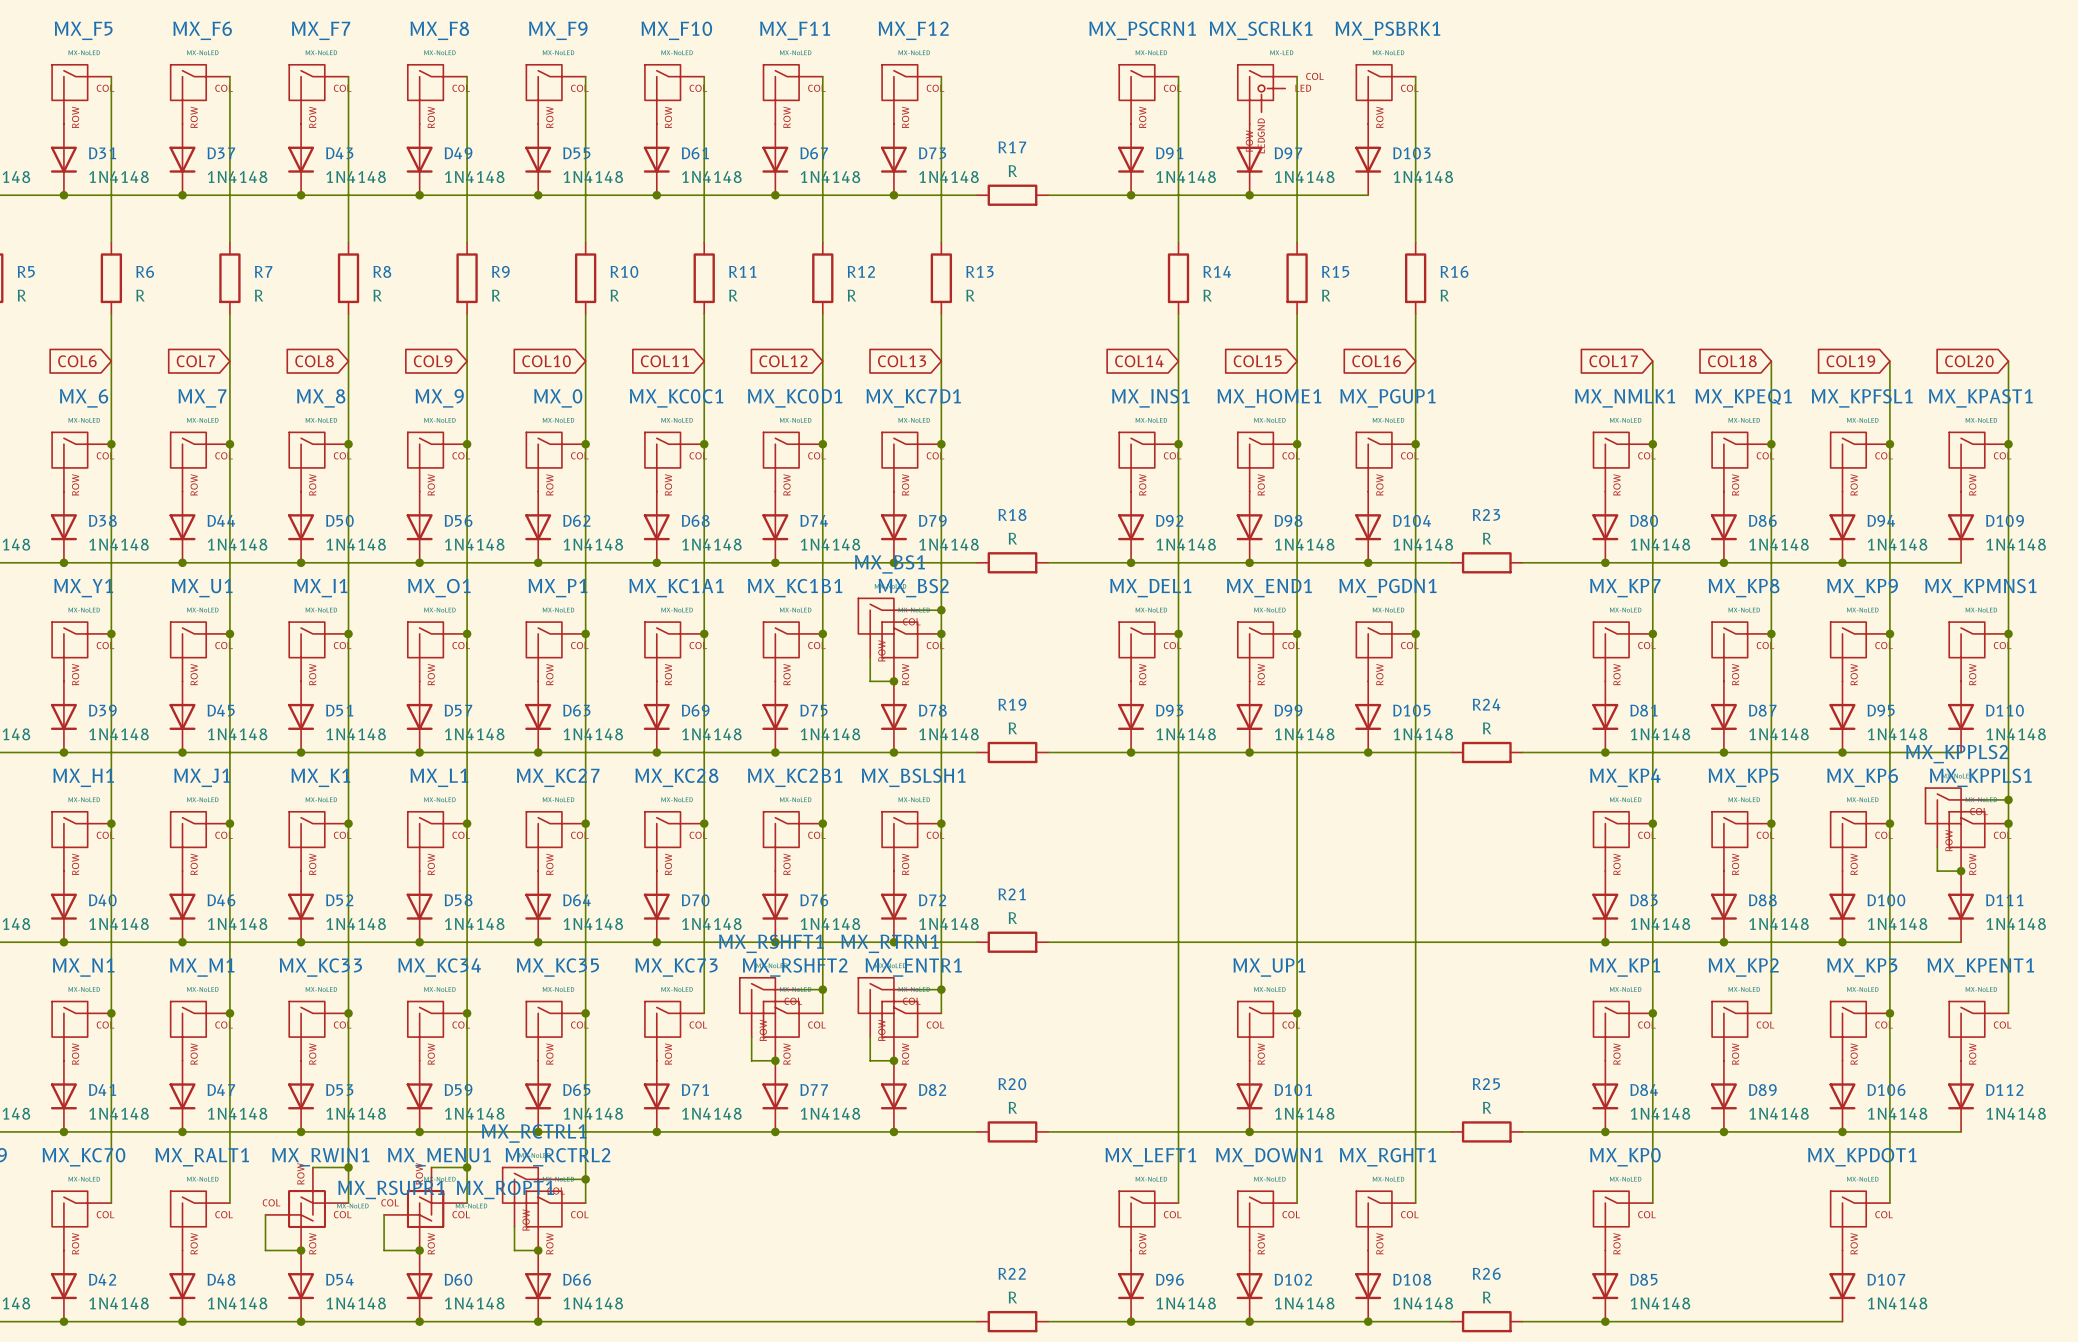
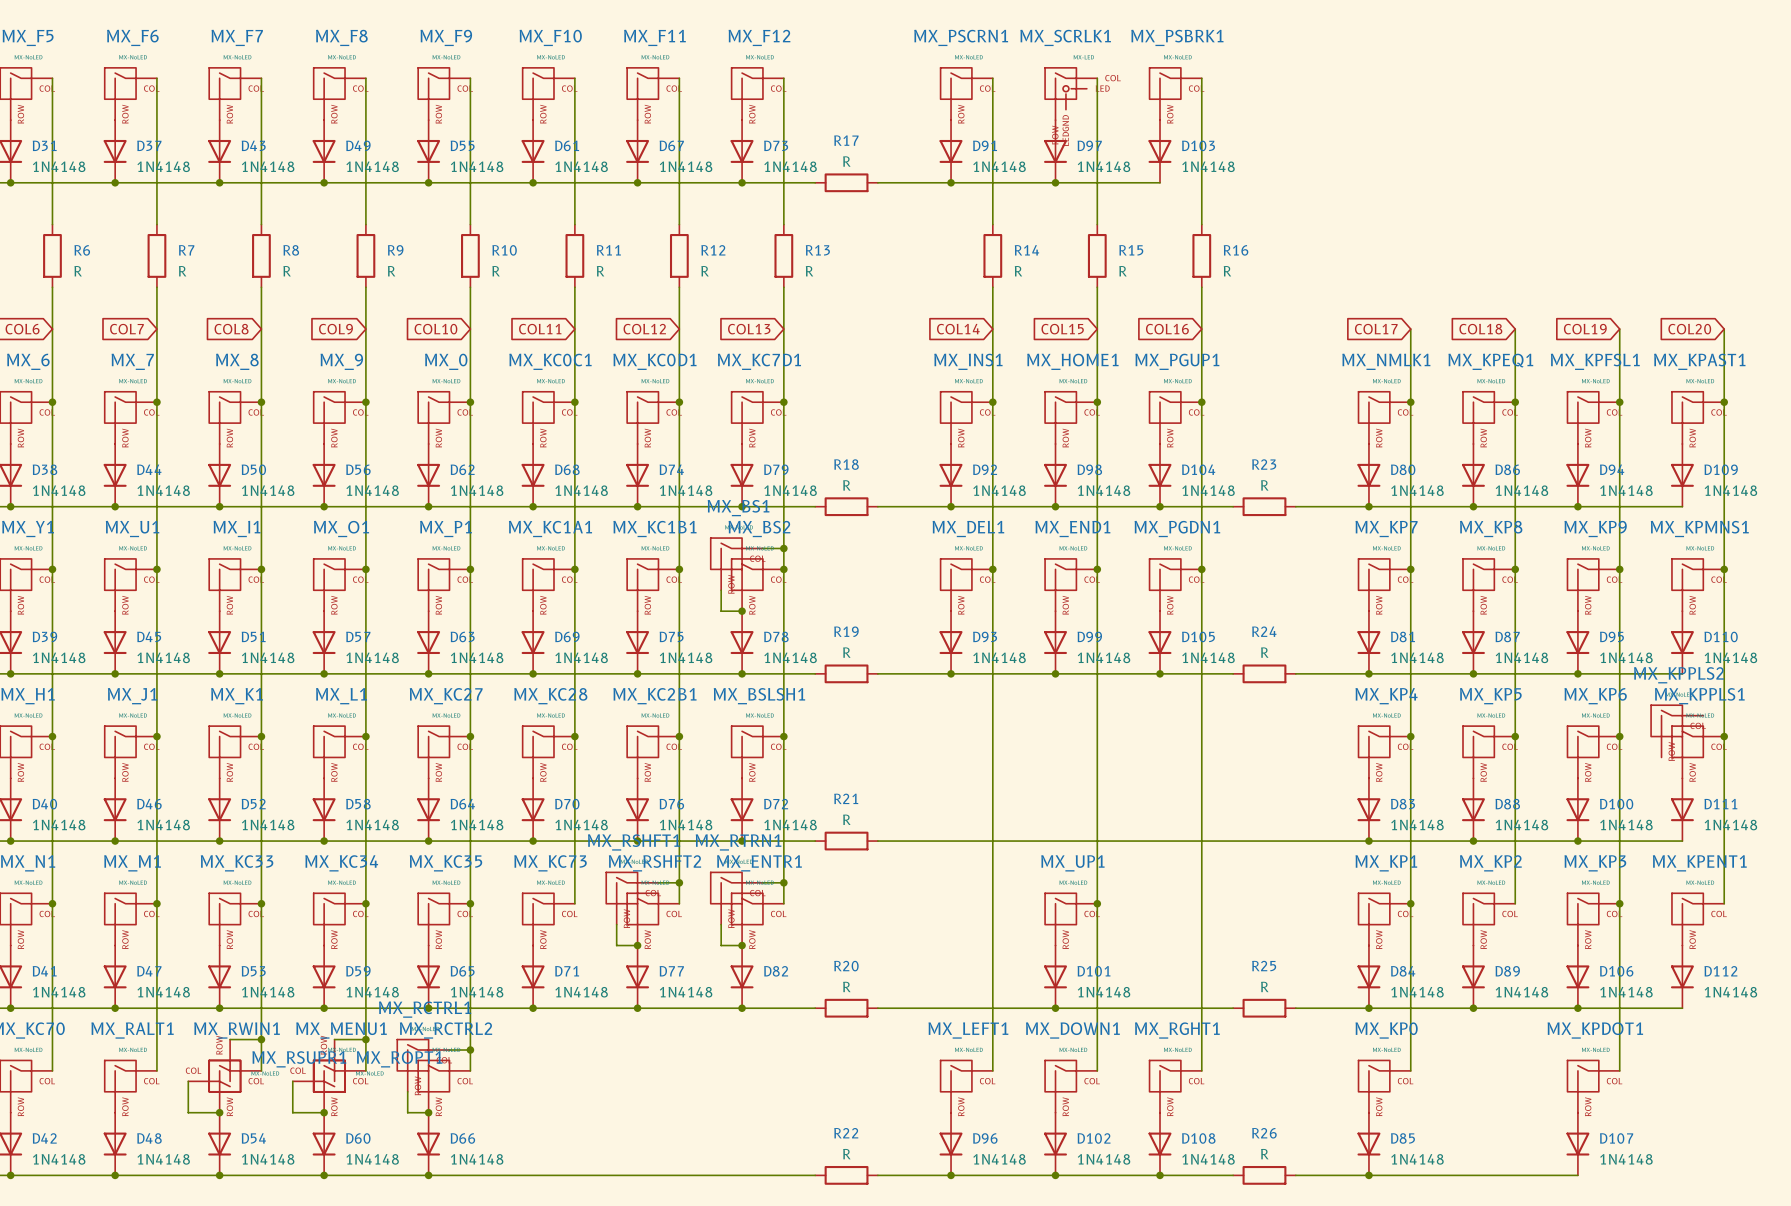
wire: (1984, 799) (2008, 799) -> none
junction: (2008, 799) -> none
wire: (1937, 847) (1937, 871) (1961, 871) -> none
junction: (1961, 871) -> none

